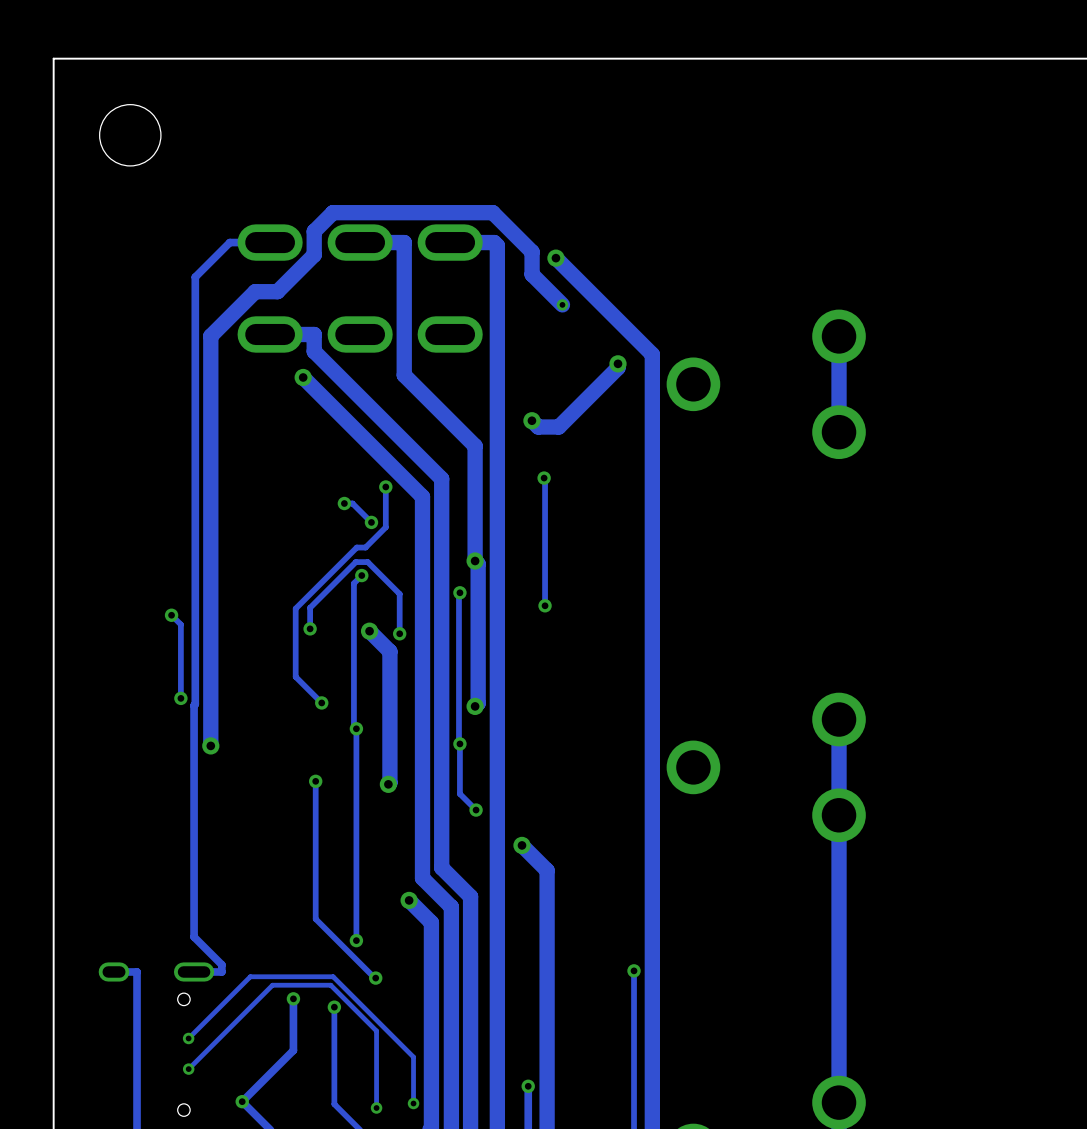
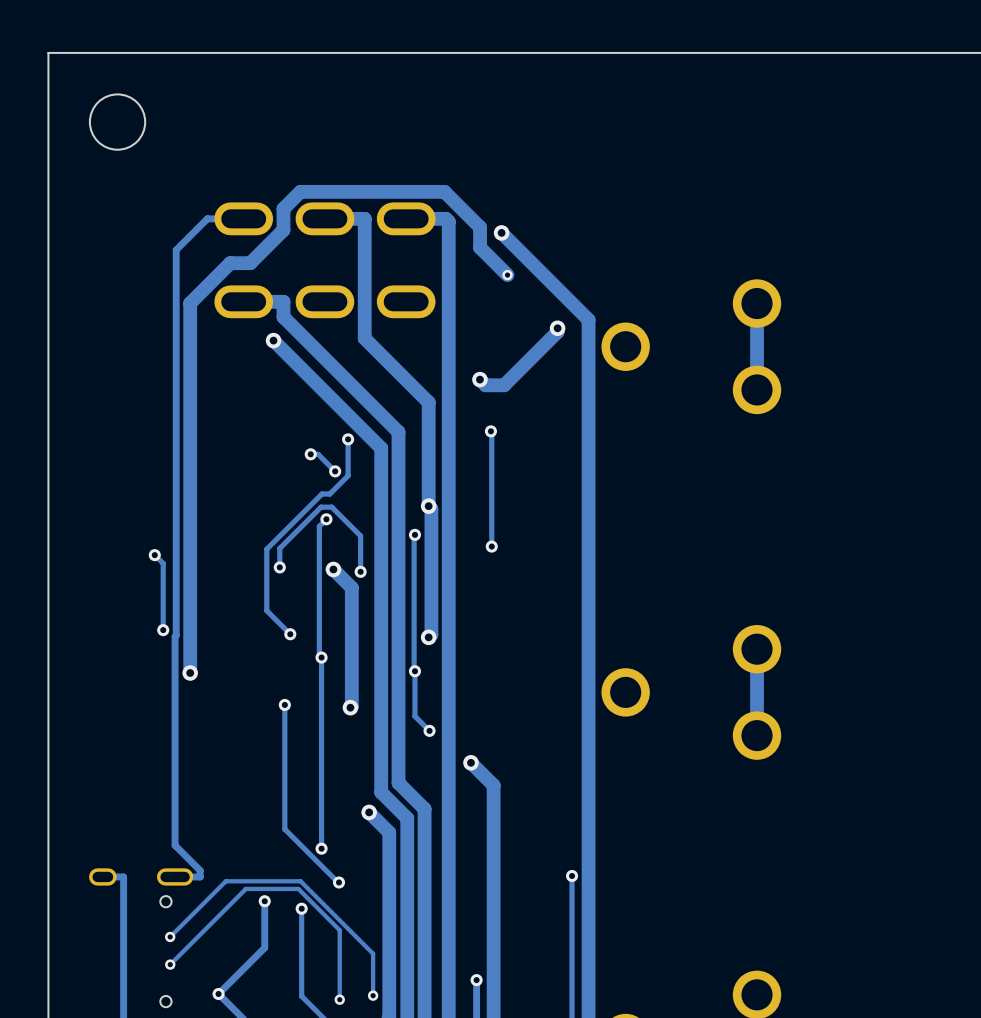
track: (839, 815) (839, 1102) -> none

